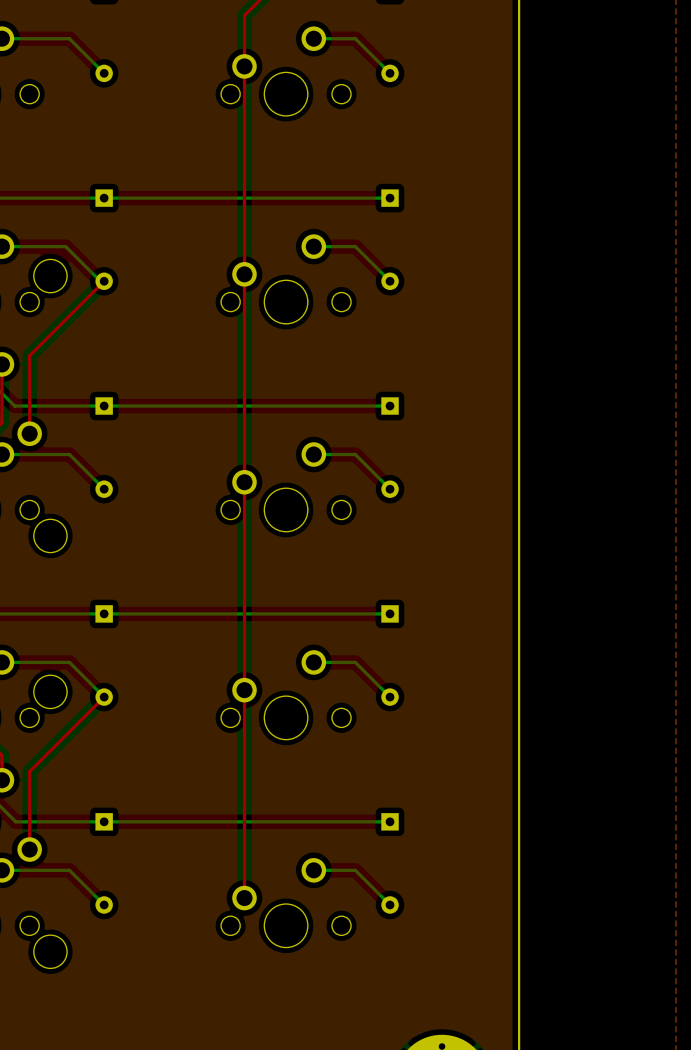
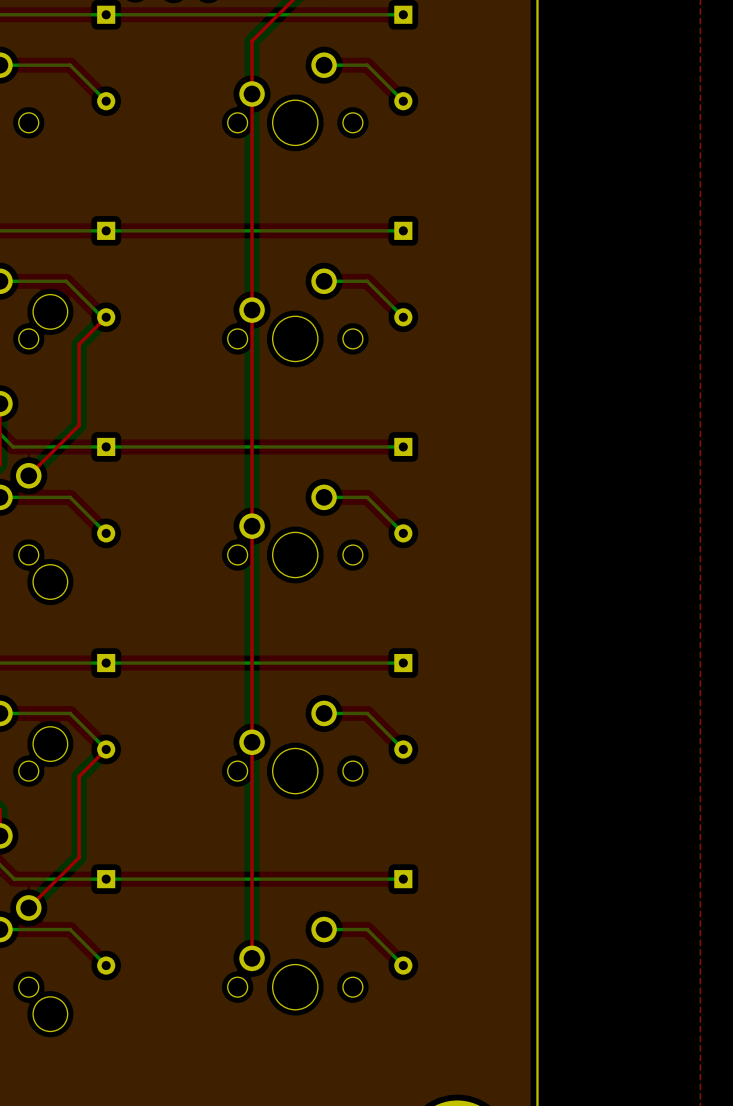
top track: (78, 307) (29, 355) (29, 433) -> (79, 344) (79, 425) (28, 475)
top track: (78, 723) (29, 771) (29, 849) -> (79, 776) (79, 857) (28, 907)

